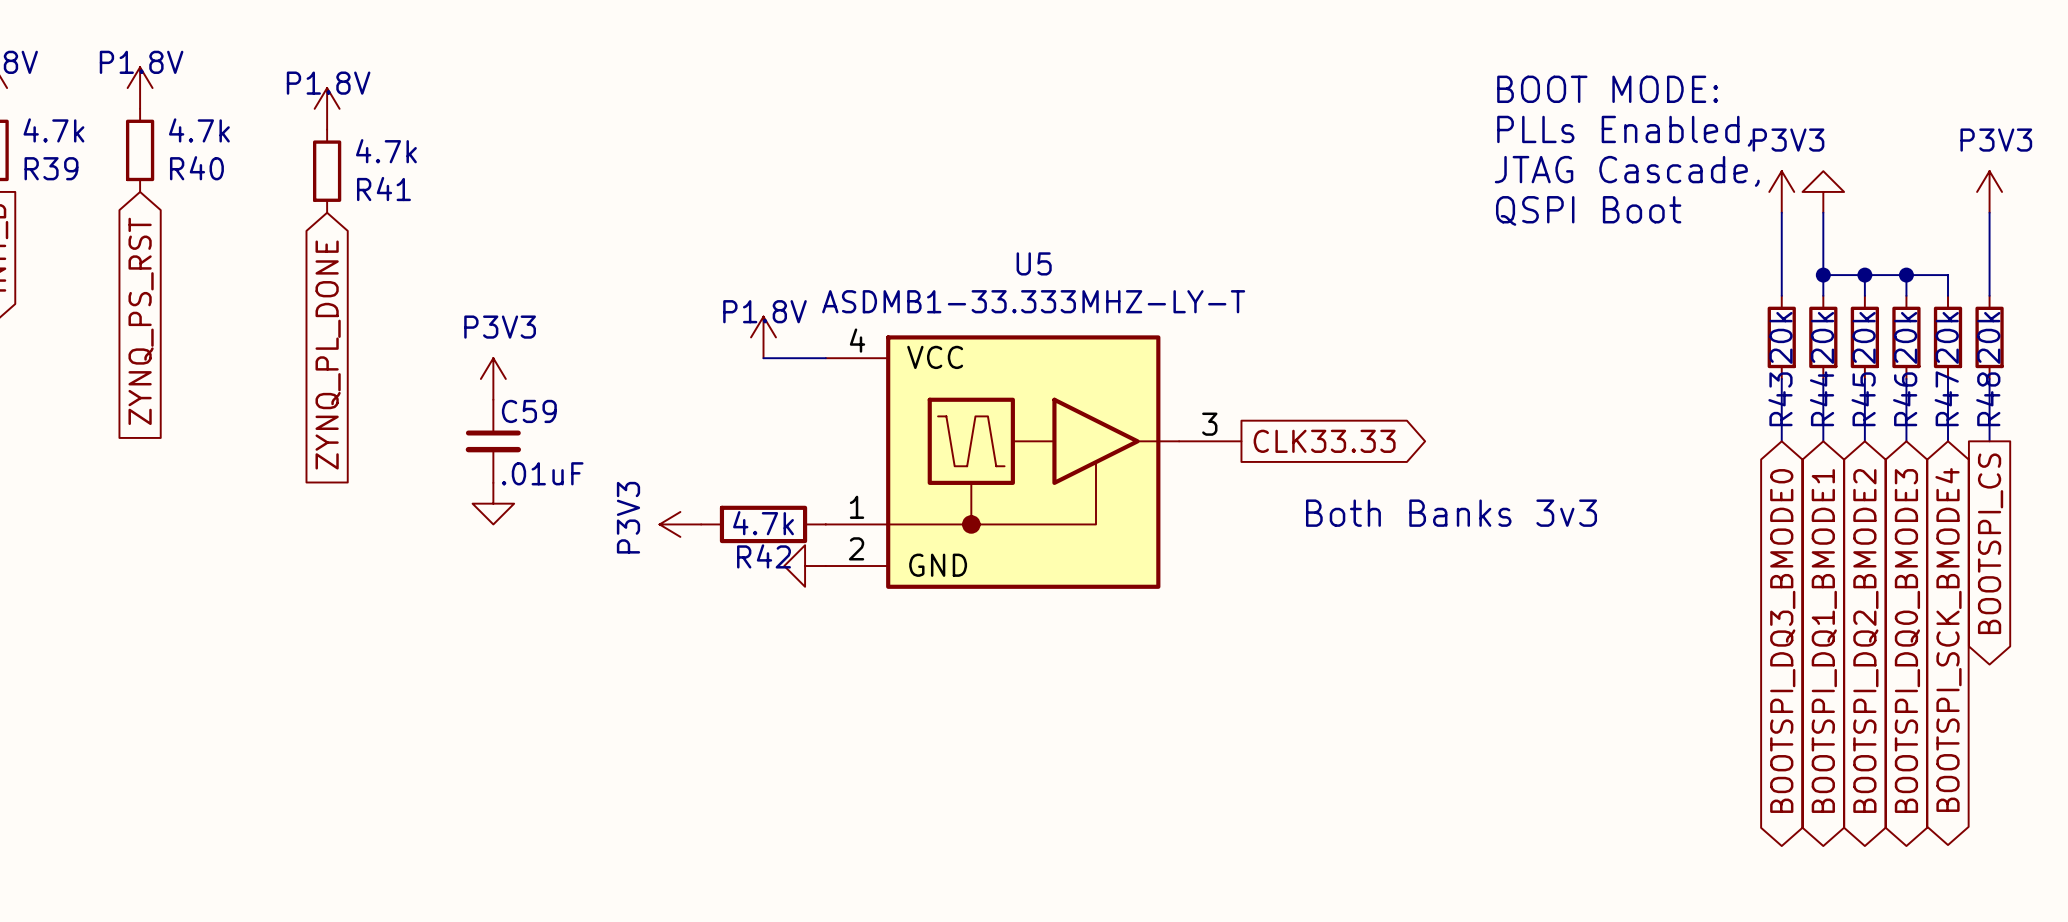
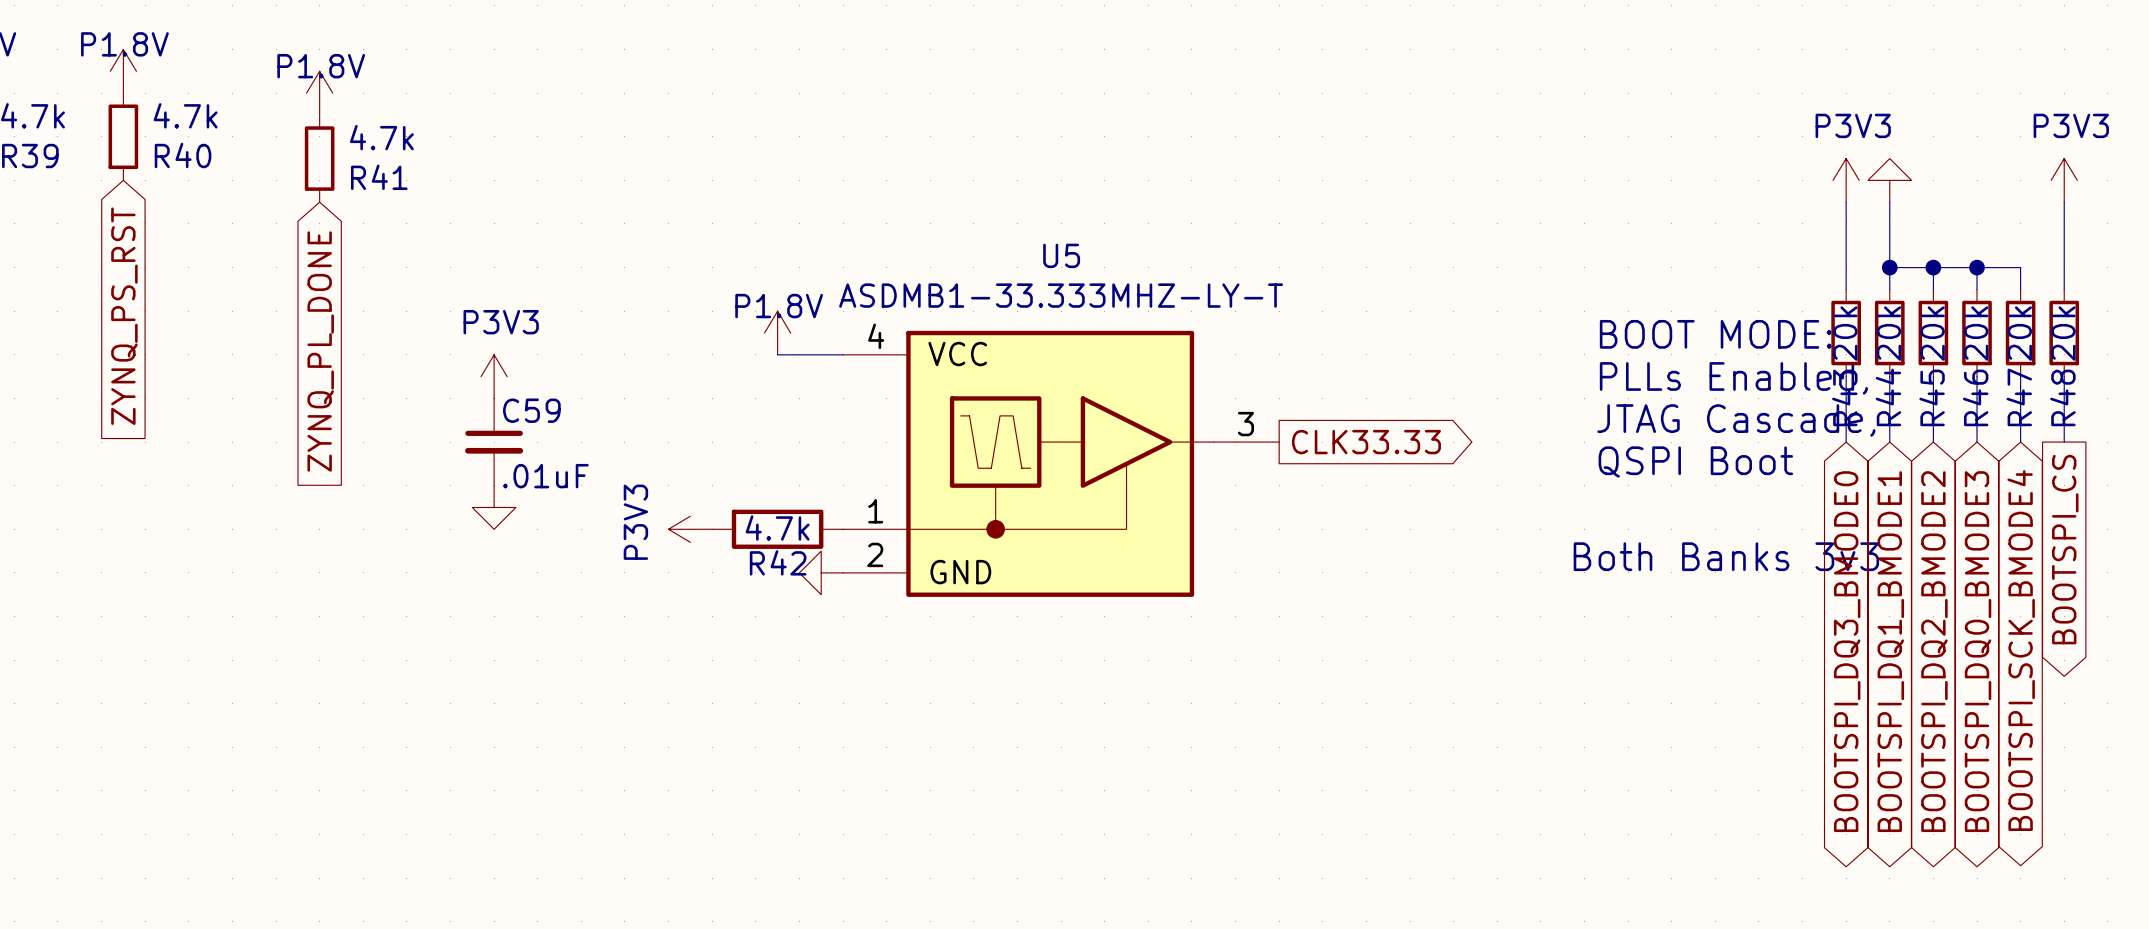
text position: BOOT MODE: (1607, 89) -> BOOT MODE: (1715, 334)
text position: PLLs Enabled, (1624, 131) -> PLLs Enabled, (1733, 378)
text position: JTAG Cascade, (1627, 171) -> JTAG Cascade, (1736, 420)
text position: QSPI Boot (1588, 210) -> QSPI Boot (1695, 461)
text position: Both Banks 3v3 (1451, 513) -> Both Banks 3v3 (1726, 556)

